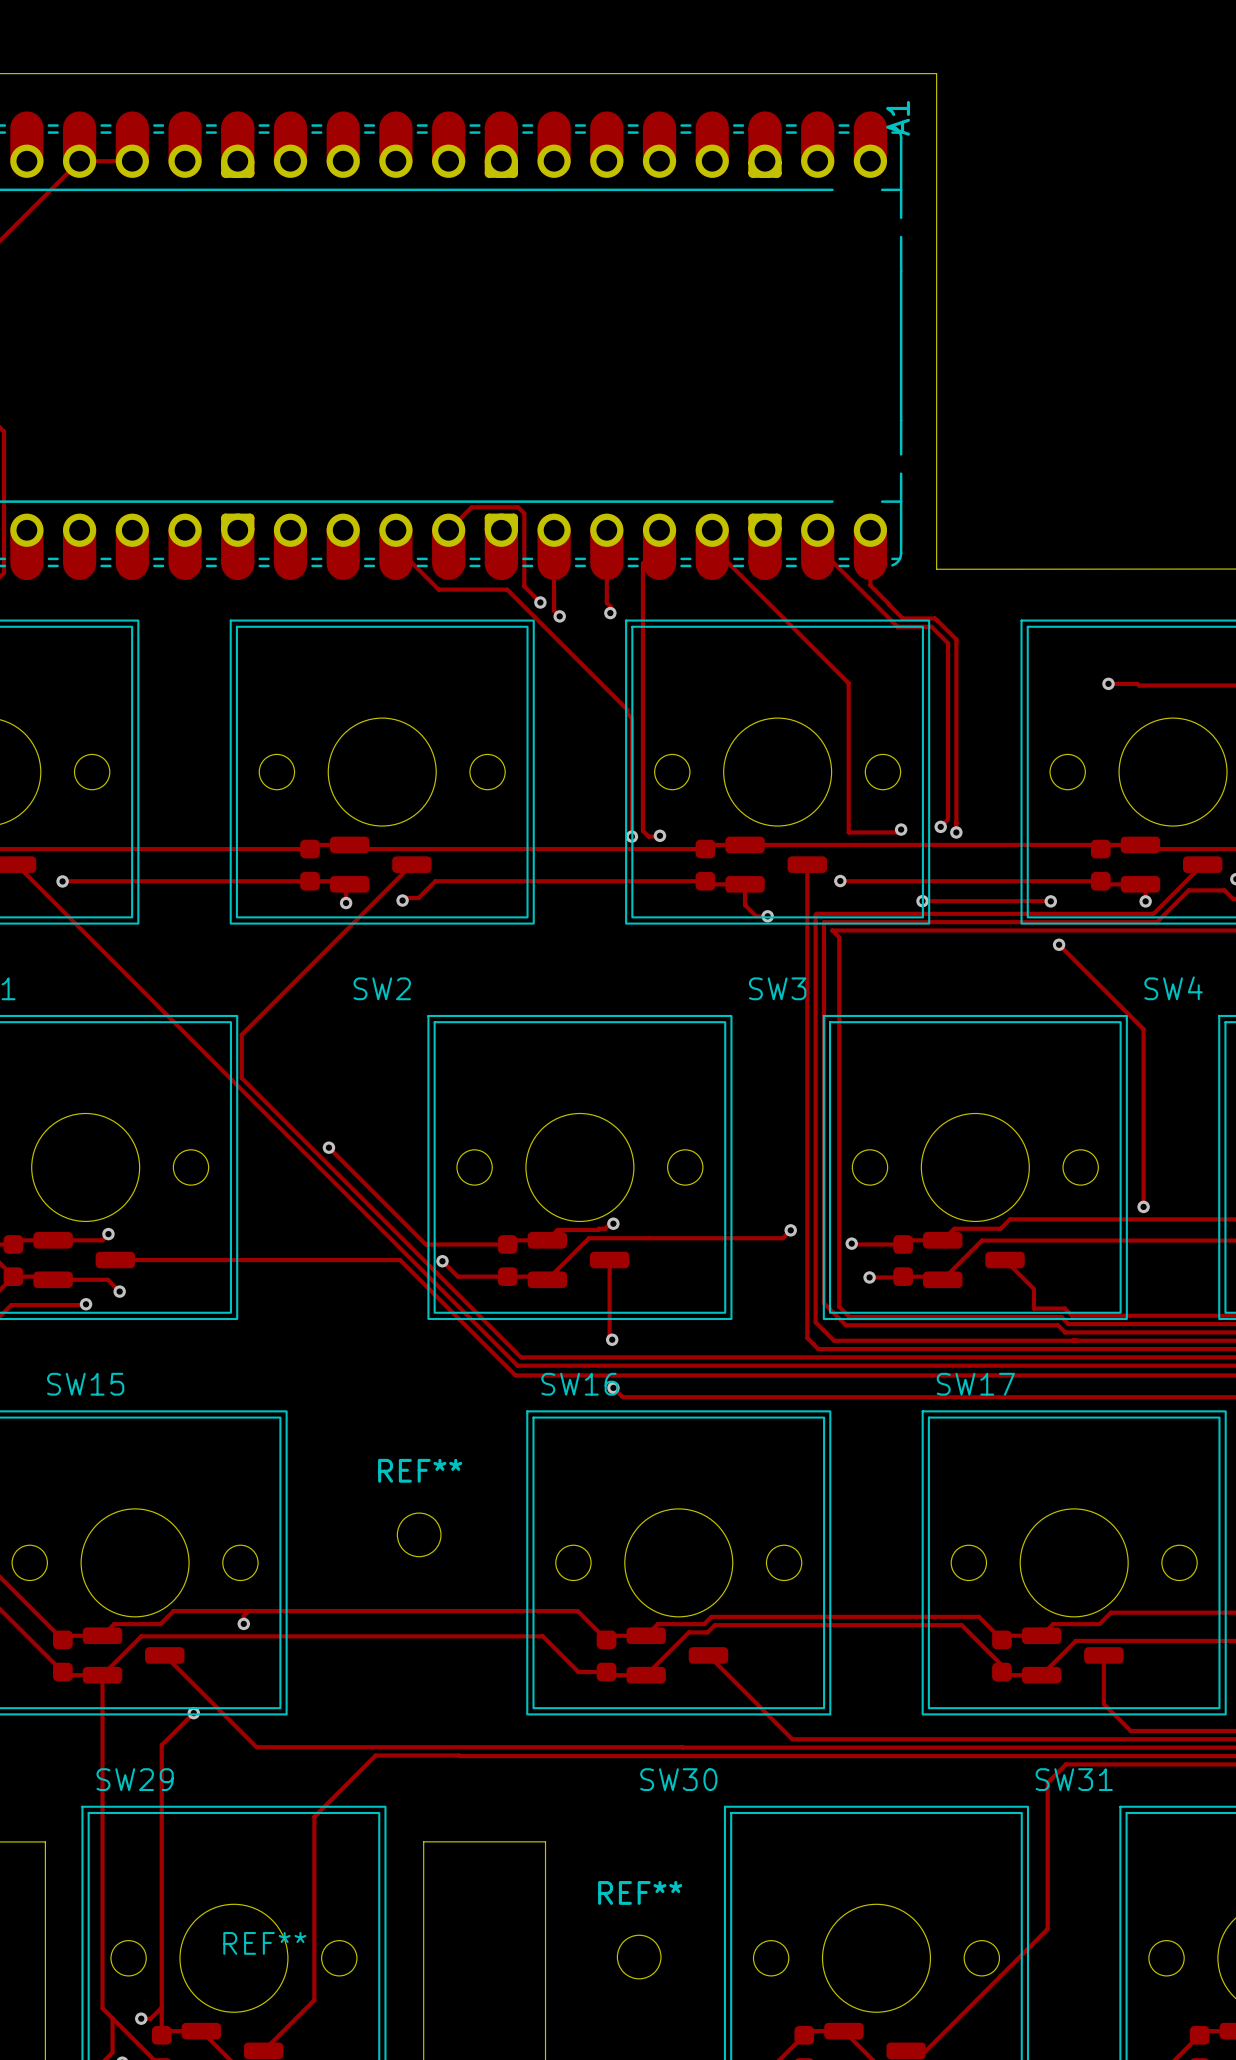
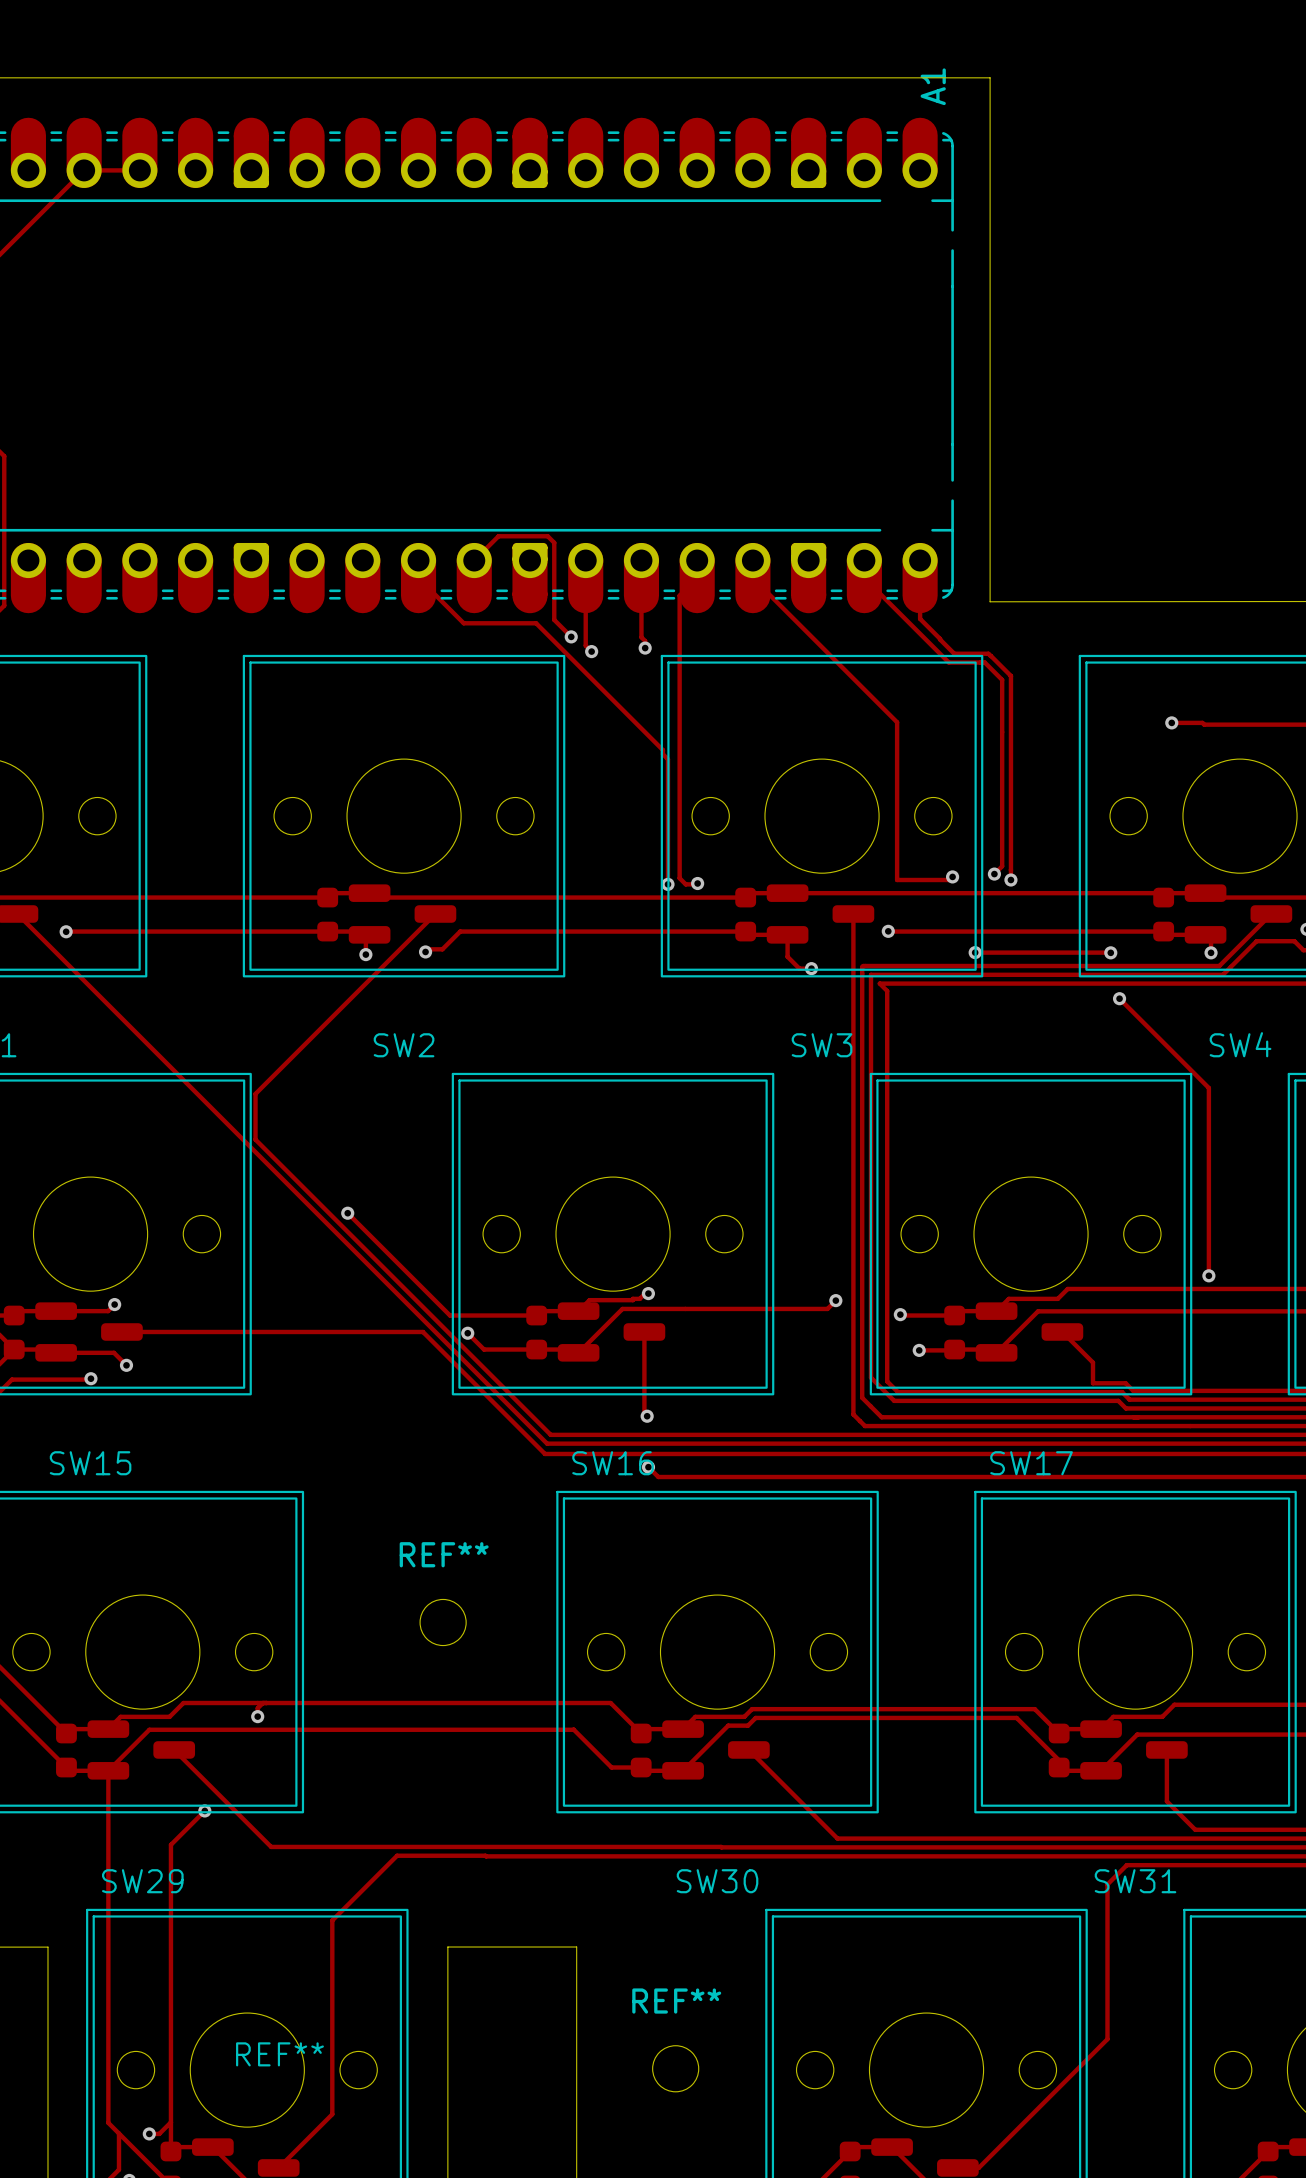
A1 name position: A1 (898, 118) -> A1 (933, 86)

